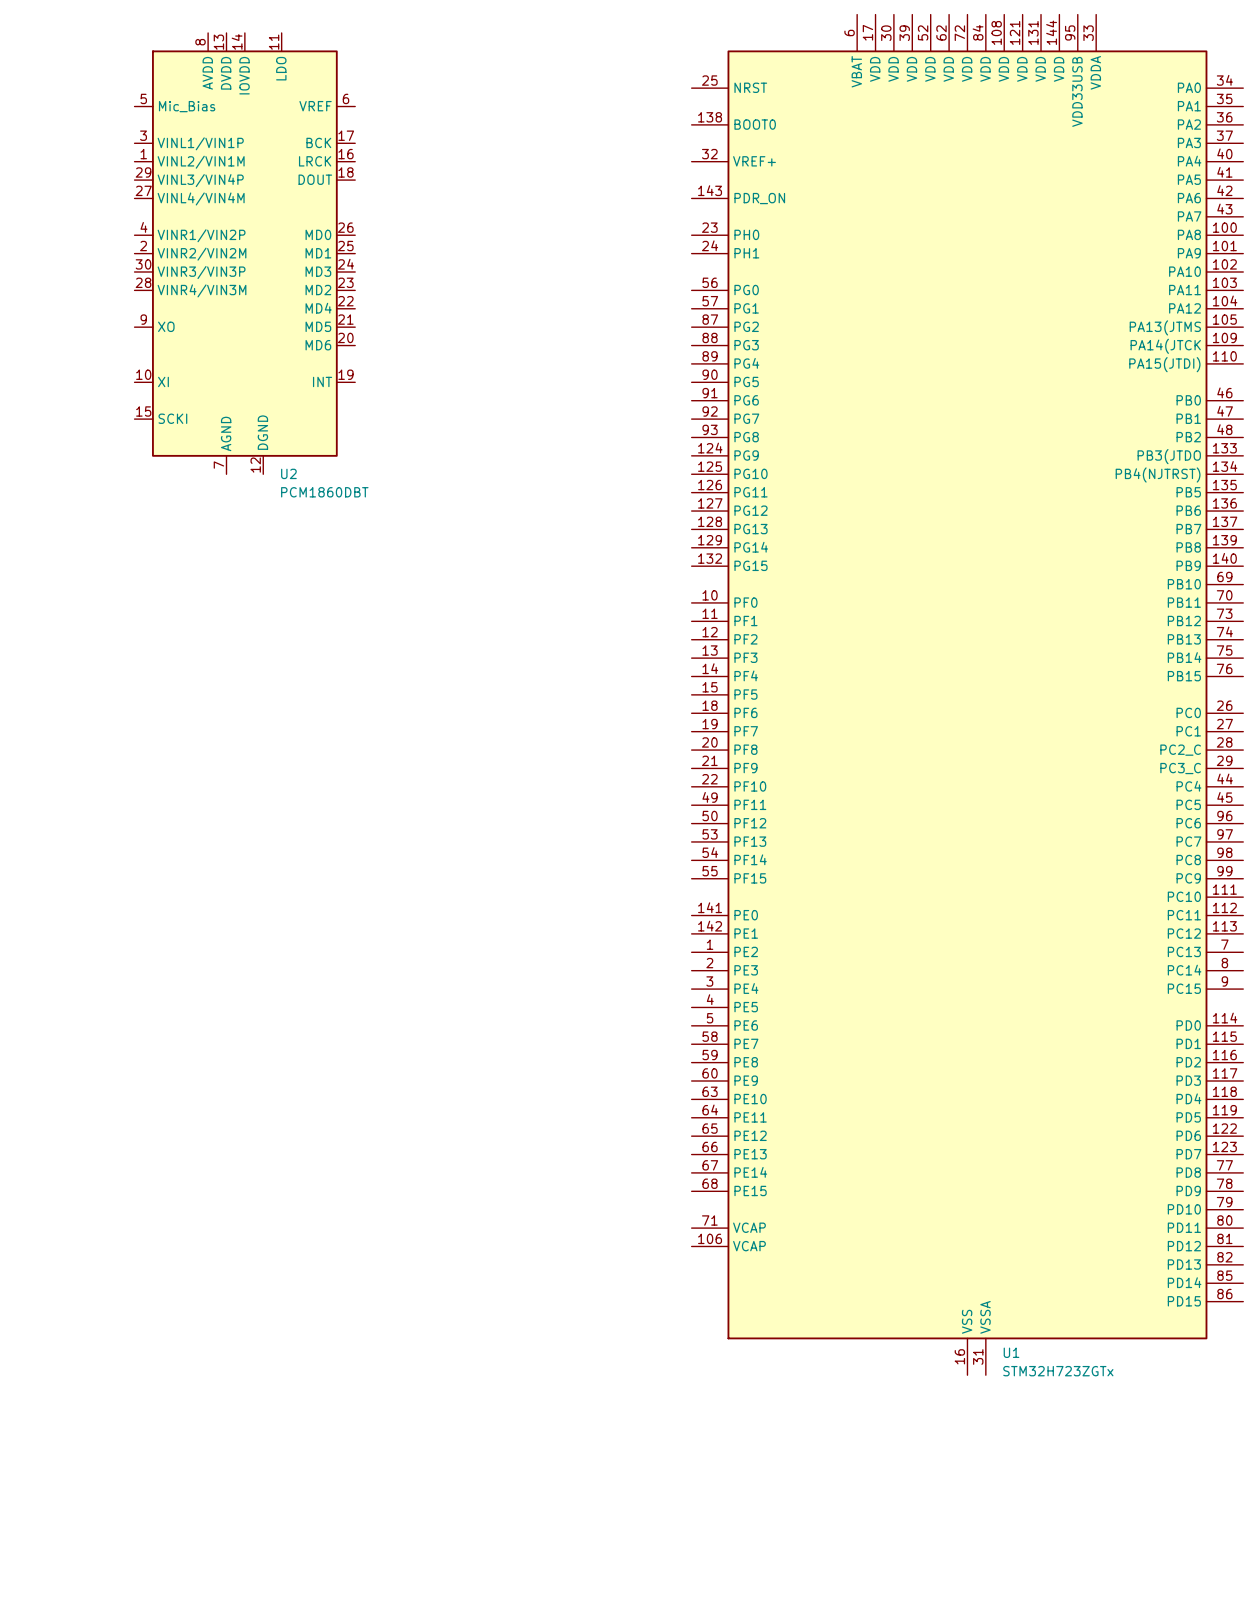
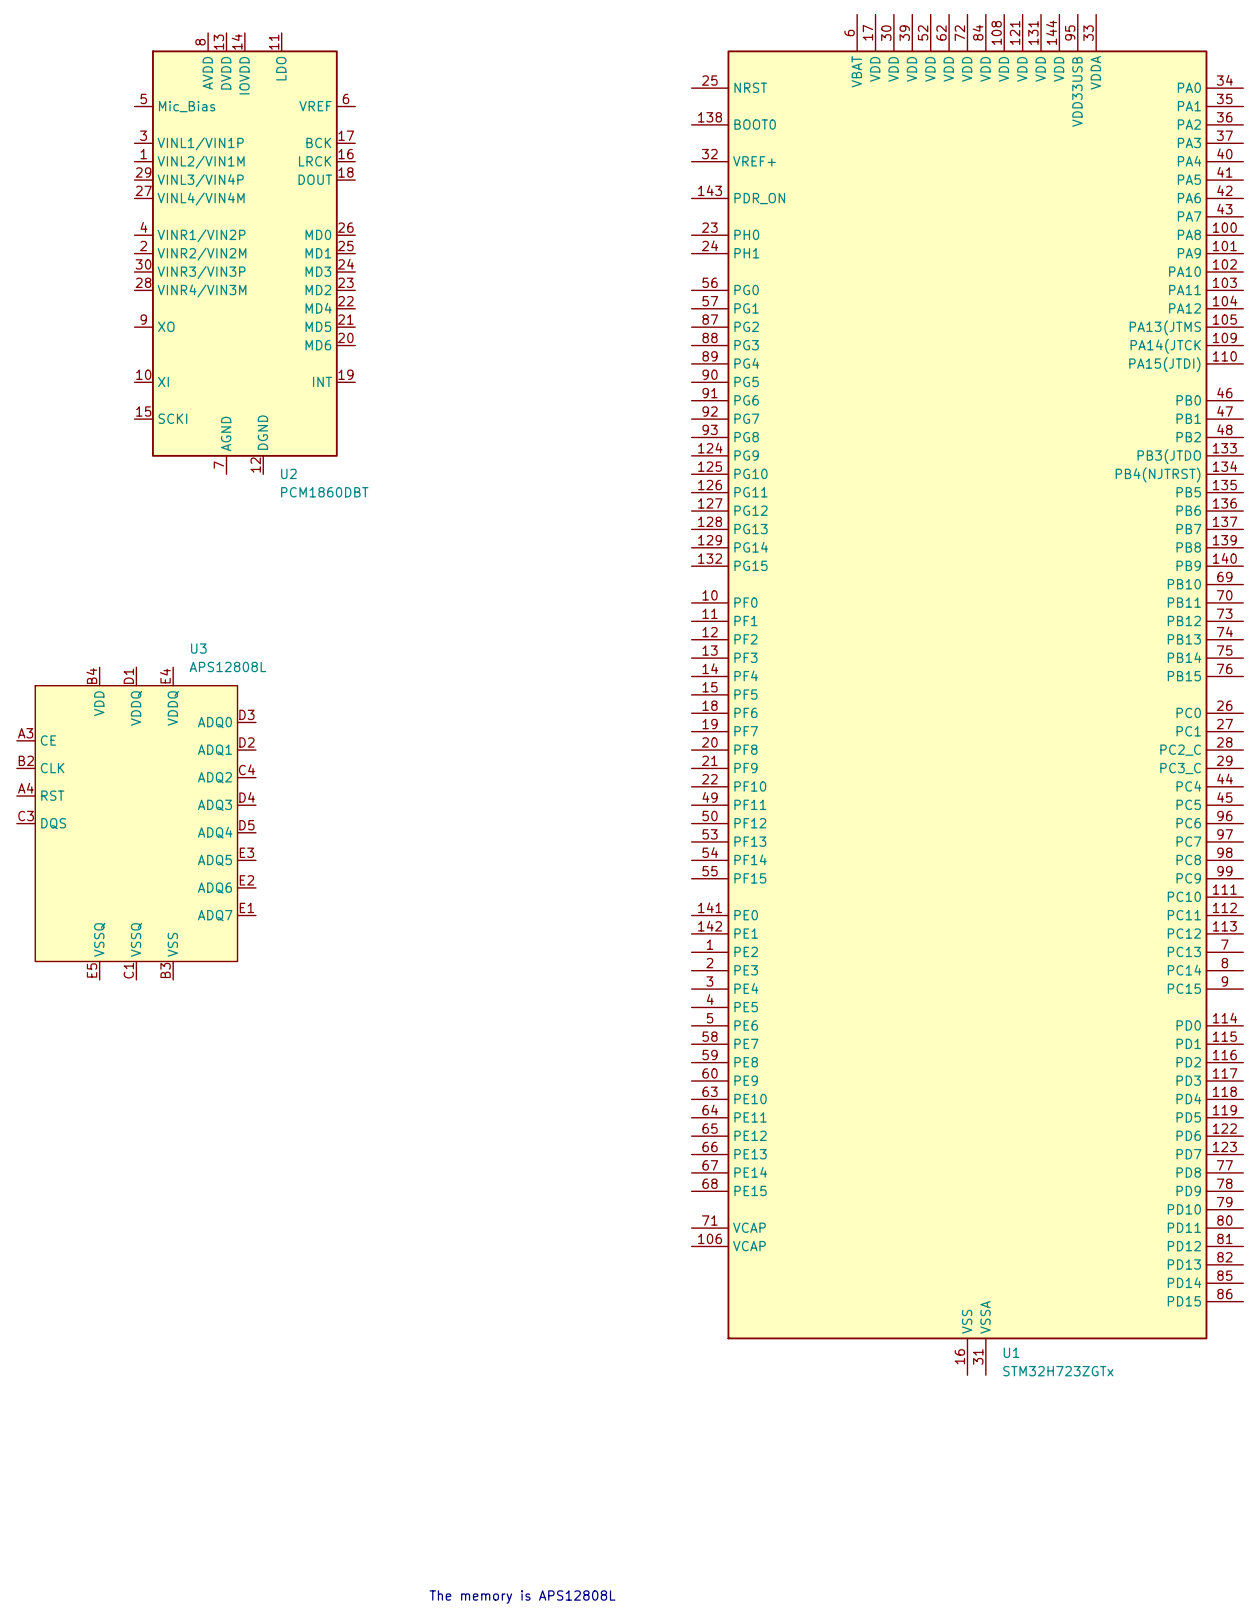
U3: none -> APS12808L (136, 823)
text: none -> The memory is APS12808L (522, 1597)

